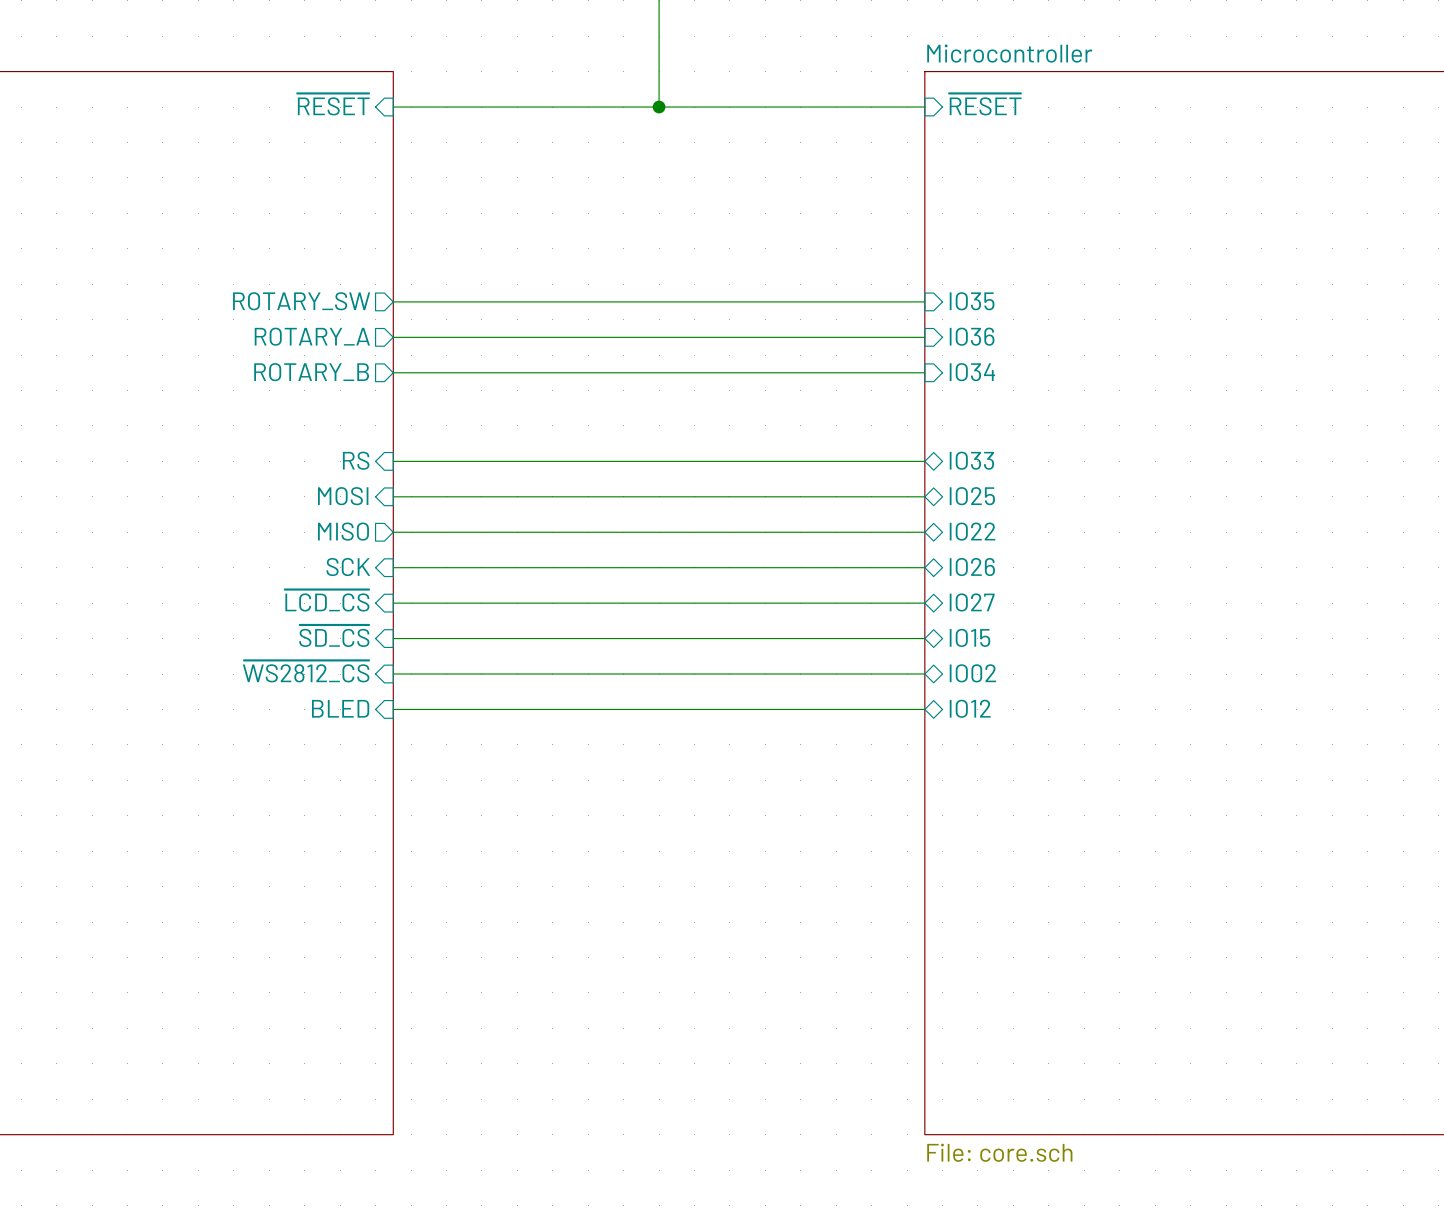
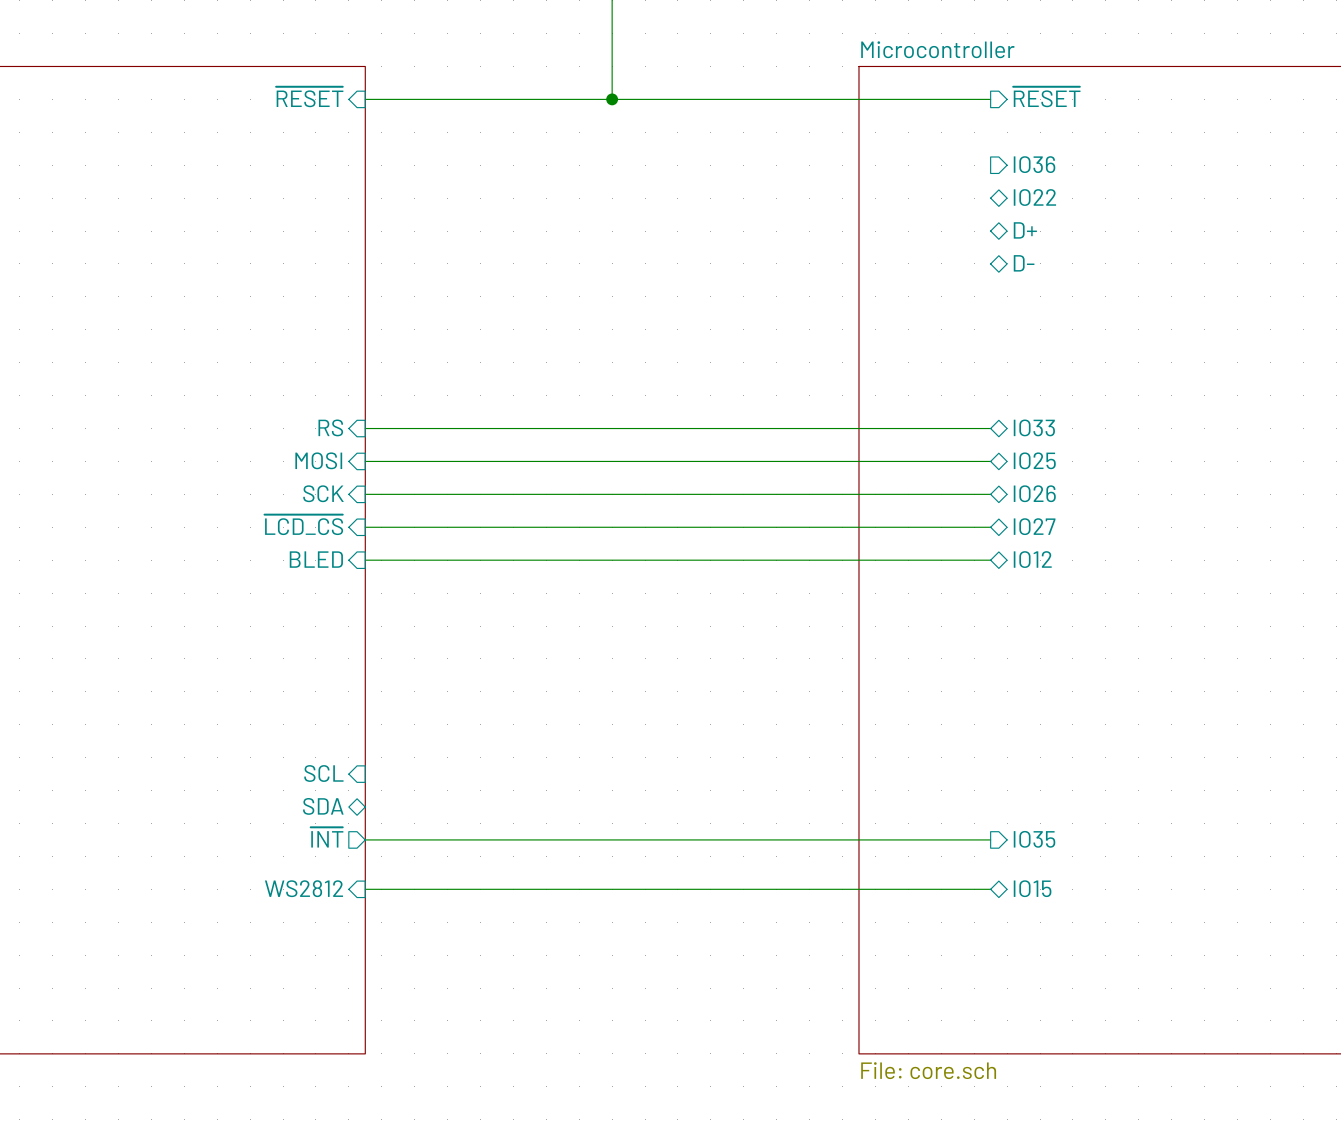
sheet pin position: ~{RESET} (985, 104) -> ~{RESET} (1046, 96)
wire: none -> (858, 99) (990, 99)
sheet pin: none -> IO22 (1034, 197)
sheet pin: none -> D+ (1025, 230)
sheet pin: none -> D- (1024, 263)
sheet pin: ROTARY_SW (301, 301) -> none
wire: (393, 301) (924, 301) -> none
sheet pin: IO35 (972, 301) -> none
sheet pin: ROTARY_A (312, 336) -> none
sheet pin position: IO36 (972, 336) -> IO36 (1034, 164)
wire: (393, 337) (924, 337) -> none
sheet pin: ROTARY_B (311, 372) -> none
wire: (393, 372) (924, 372) -> none
sheet pin: IO34 (972, 372) -> none
sheet pin position: IO33 (971, 460) -> IO33 (1034, 427)
wire: none -> (858, 428) (990, 428)
wire: none -> (858, 461) (990, 461)
sheet pin position: IO25 (972, 496) -> IO25 (1034, 460)
sheet pin shape: output (343, 531) -> input (323, 493)
sheet pin: MISO (343, 531) -> SCK (323, 493)
sheet pin: IO22 (972, 531) -> none
wire: none -> (858, 494) (990, 494)
sheet pin: SCK (348, 567) -> ~{LCD_CS} (303, 524)
wire: none -> (858, 527) (990, 527)
sheet pin position: IO26 (972, 567) -> IO26 (1034, 493)
sheet pin: ~{LCD_CS} (327, 600) -> BLED (316, 559)
sheet pin position: IO27 (972, 602) -> IO27 (1034, 526)
wire: none -> (858, 560) (990, 560)
sheet pin: ~{SD_CS} (334, 635) -> none
sheet pin: IO15 (969, 637) -> none
wire: (393, 638) (924, 638) -> none
sheet pin: ~{WS2812_CS} (306, 671) -> none
sheet pin: IO02 (972, 673) -> none
wire: (393, 674) (924, 674) -> none
sheet pin: BLED (340, 708) -> none
sheet pin position: IO12 (970, 708) -> IO12 (1032, 559)
wire: (393, 709) (924, 709) -> none
sheet pin: none -> SCL (323, 773)
sheet pin: none -> SDA (323, 806)
sheet pin: none -> ~{INT} (327, 837)
sheet pin: none -> IO35 (1034, 839)
wire: none -> (365, 839) (990, 839)
sheet pin: none -> WS2812 (304, 888)
sheet pin: none -> IO15 (1032, 888)
wire: none -> (365, 889) (990, 889)

